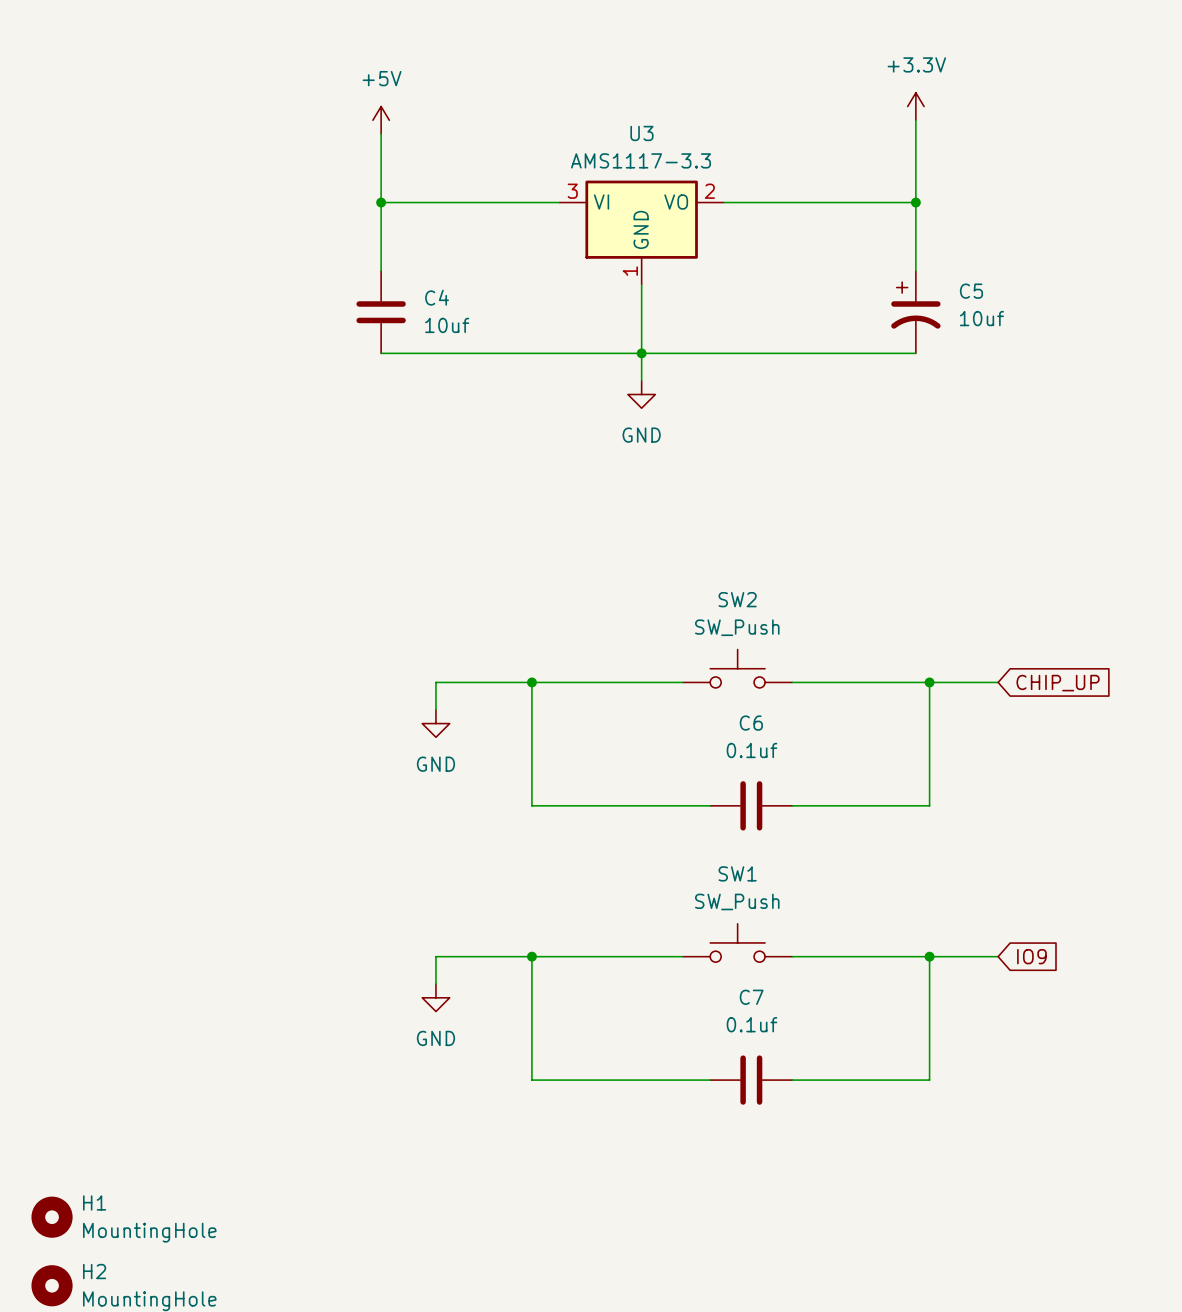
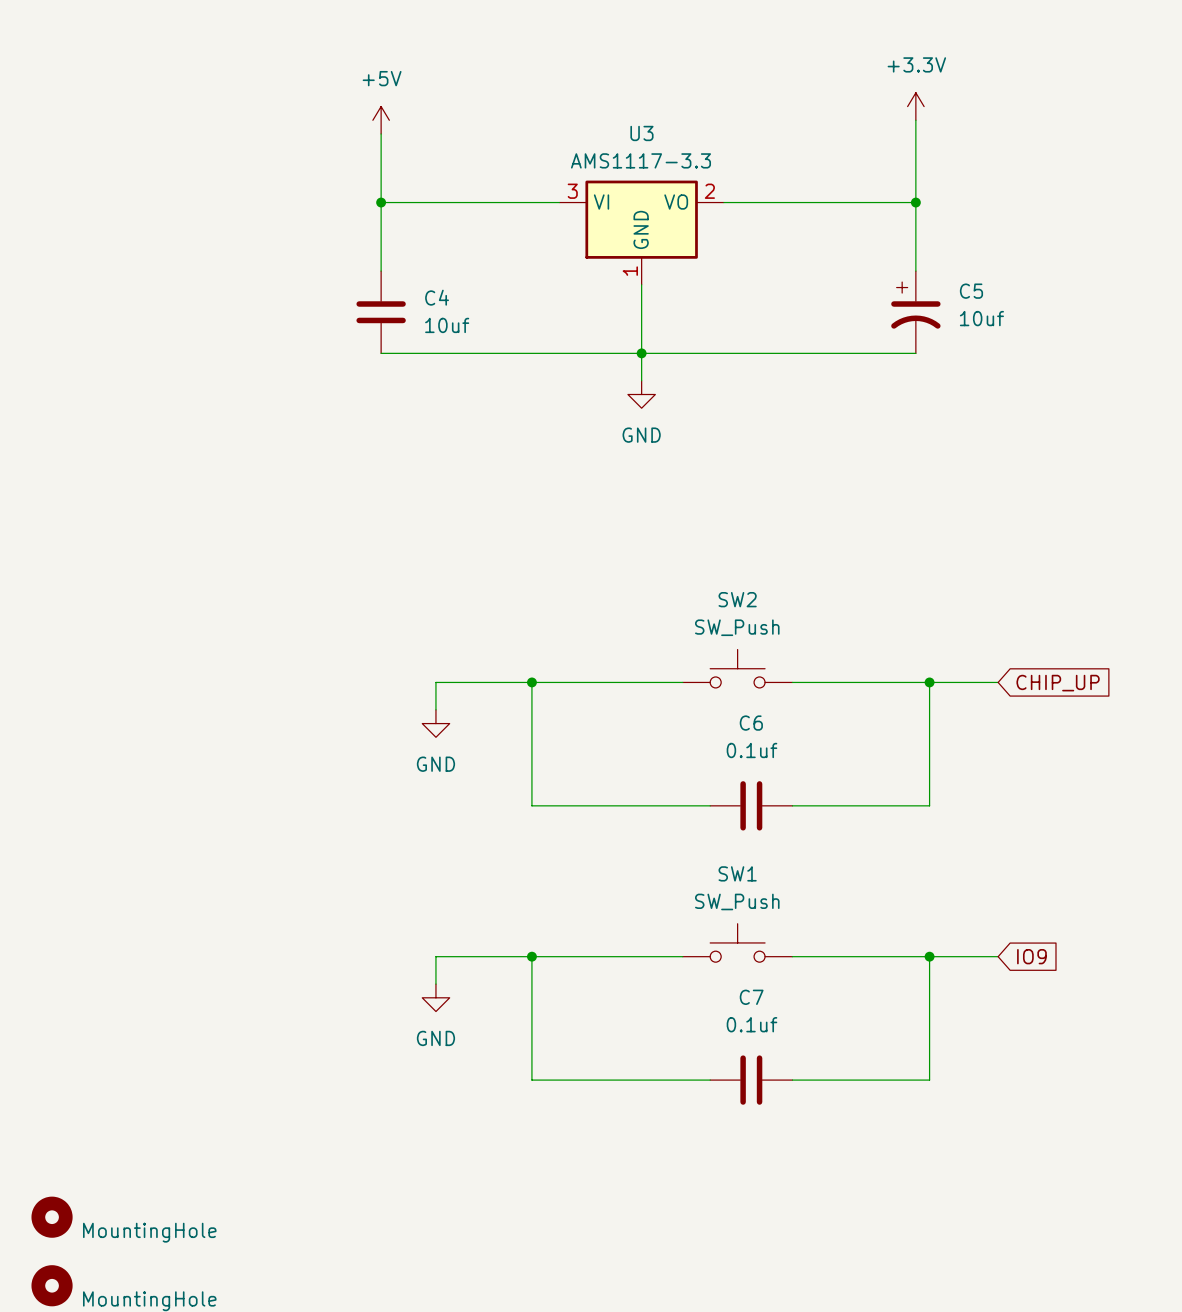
H1 name: H1 (94, 1202) -> none
H2 name: H2 (94, 1271) -> none

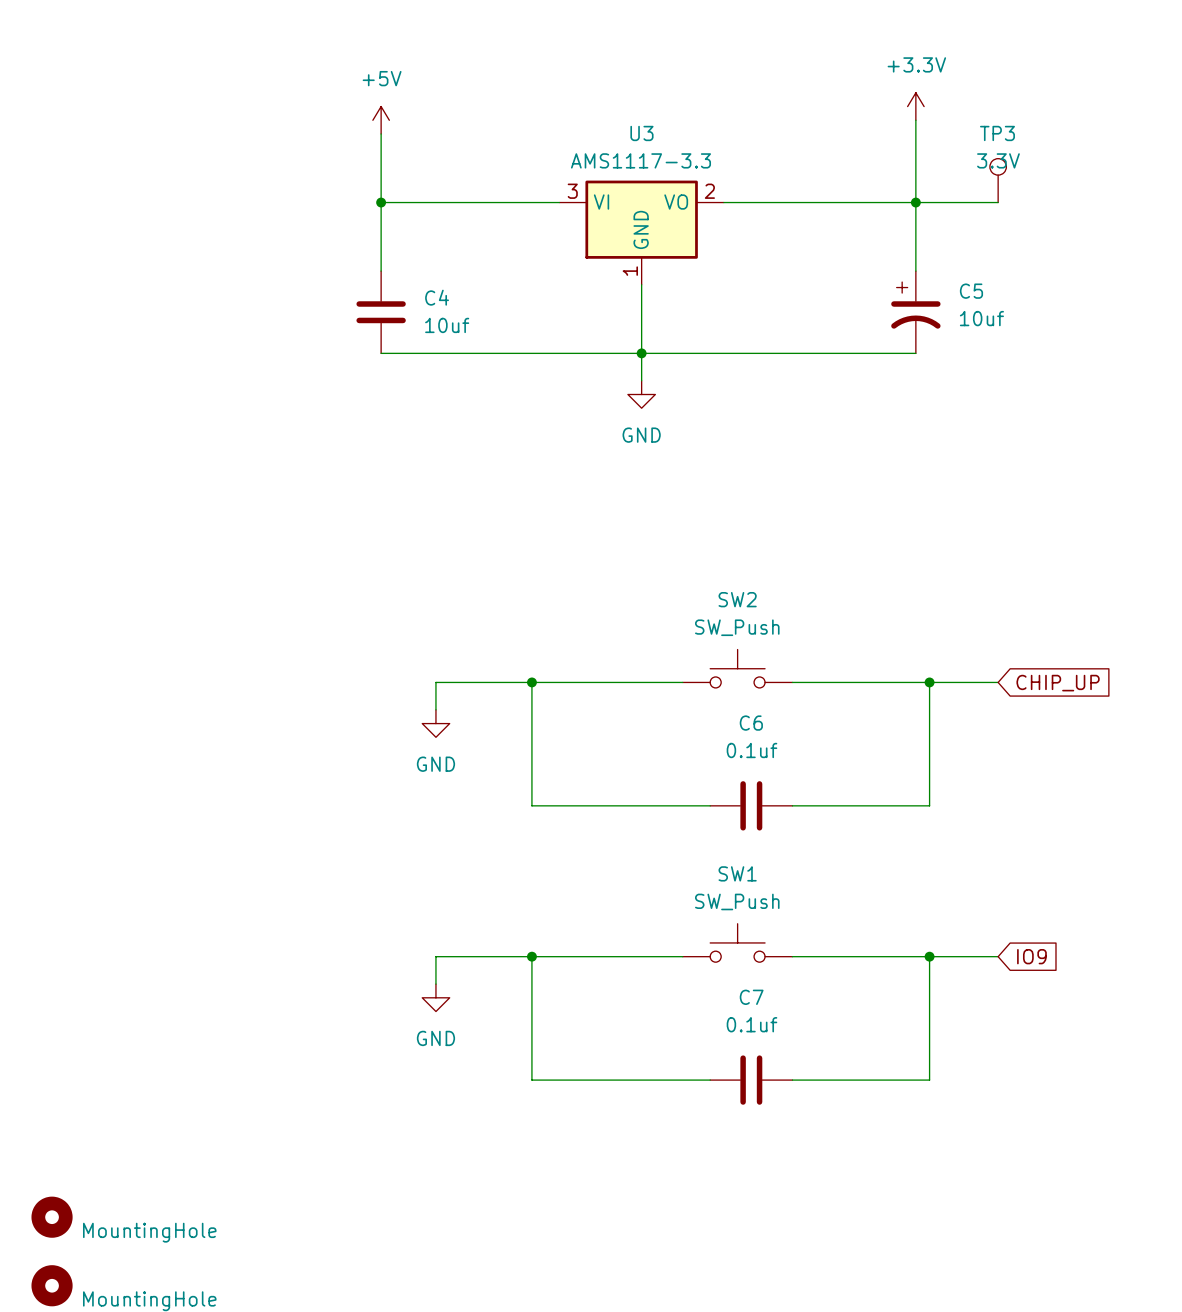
TP3: none -> 3.3V (998, 180)
wire: none -> (915, 202) (998, 202)

